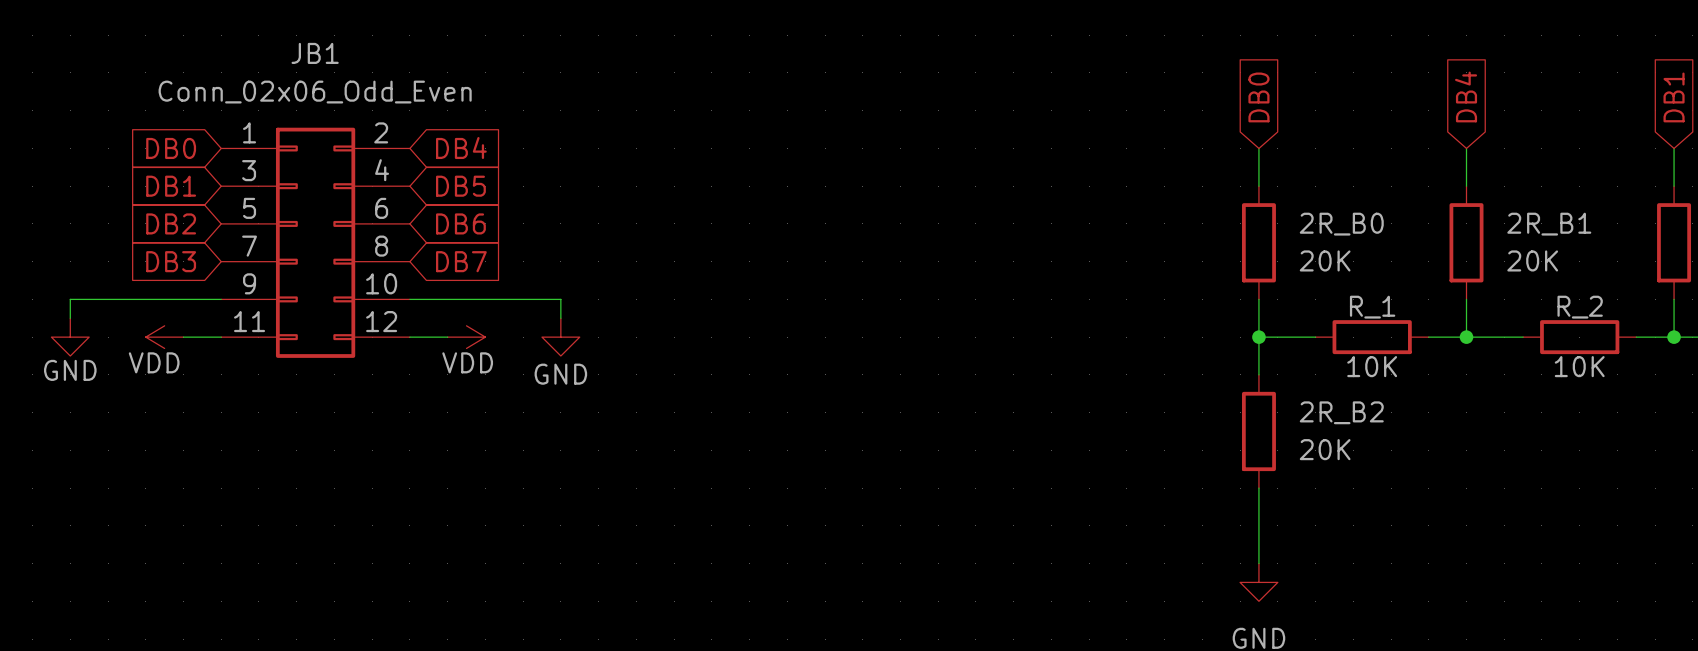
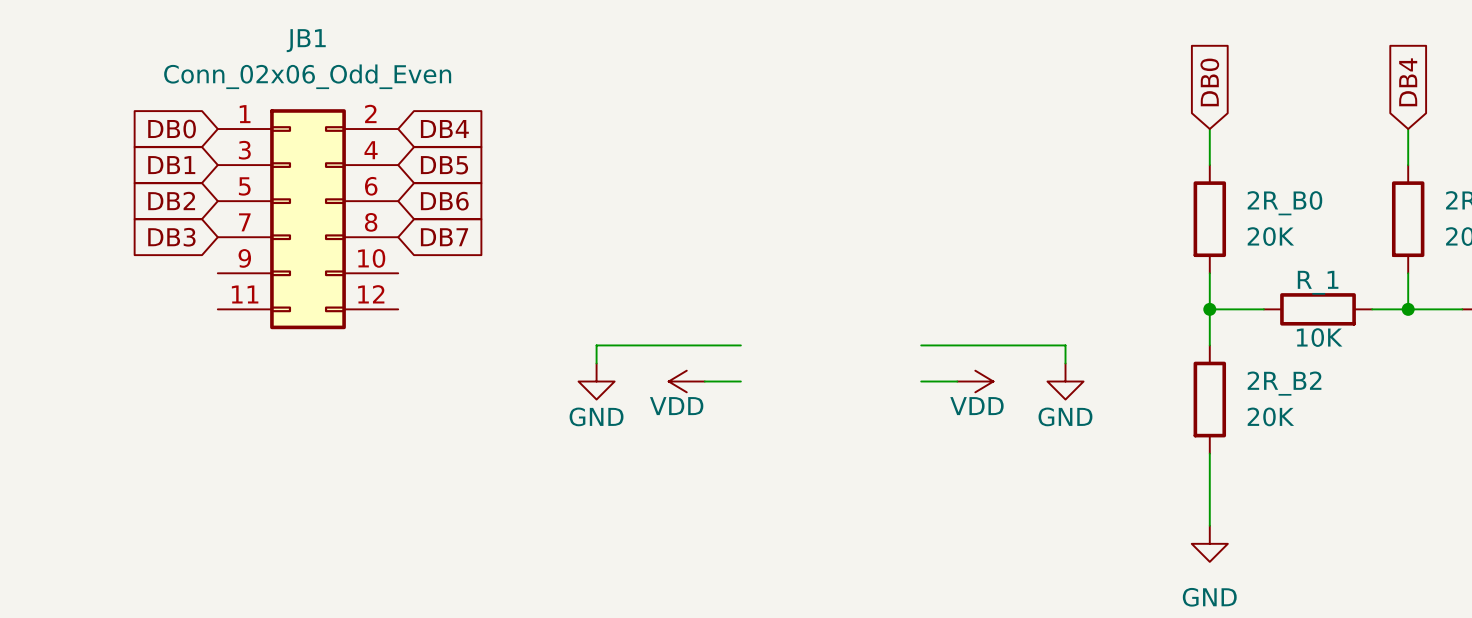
wire: (221, 299) (70, 299) (70, 318) -> none
wire: (409, 299) (560, 299) (560, 318) -> none
power symbol: GND (70, 337) -> none
power symbol: VDD (164, 337) -> none
wire: (183, 337) (221, 337) -> none
wire: (409, 337) (447, 337) -> (704, 381) (740, 381)
power symbol rotation: 0° (466, 337) -> 180° (686, 381)
power symbol position: VDD (466, 337) -> VDD (686, 381)
power symbol position: GND (560, 337) -> GND (596, 381)
wire: none -> (740, 345) (596, 345) (596, 363)
wire: none -> (921, 345) (1065, 345) (1065, 363)
wire: none -> (921, 381) (957, 381)
power symbol: none -> VDD (975, 381)
power symbol: none -> GND (1065, 381)

